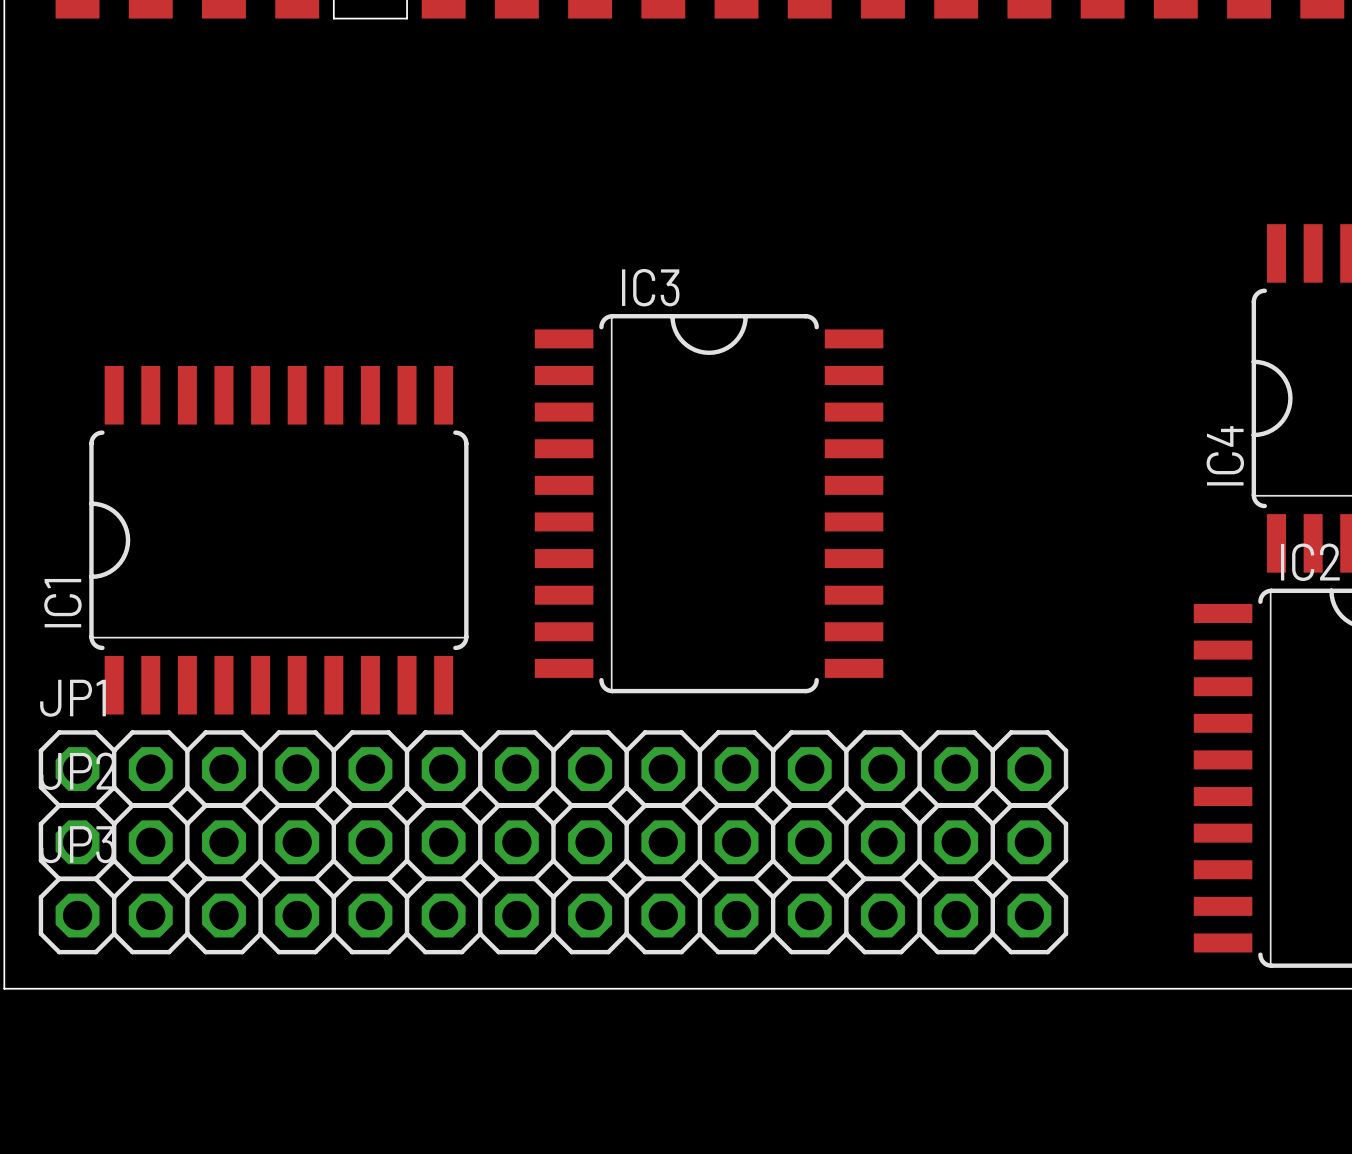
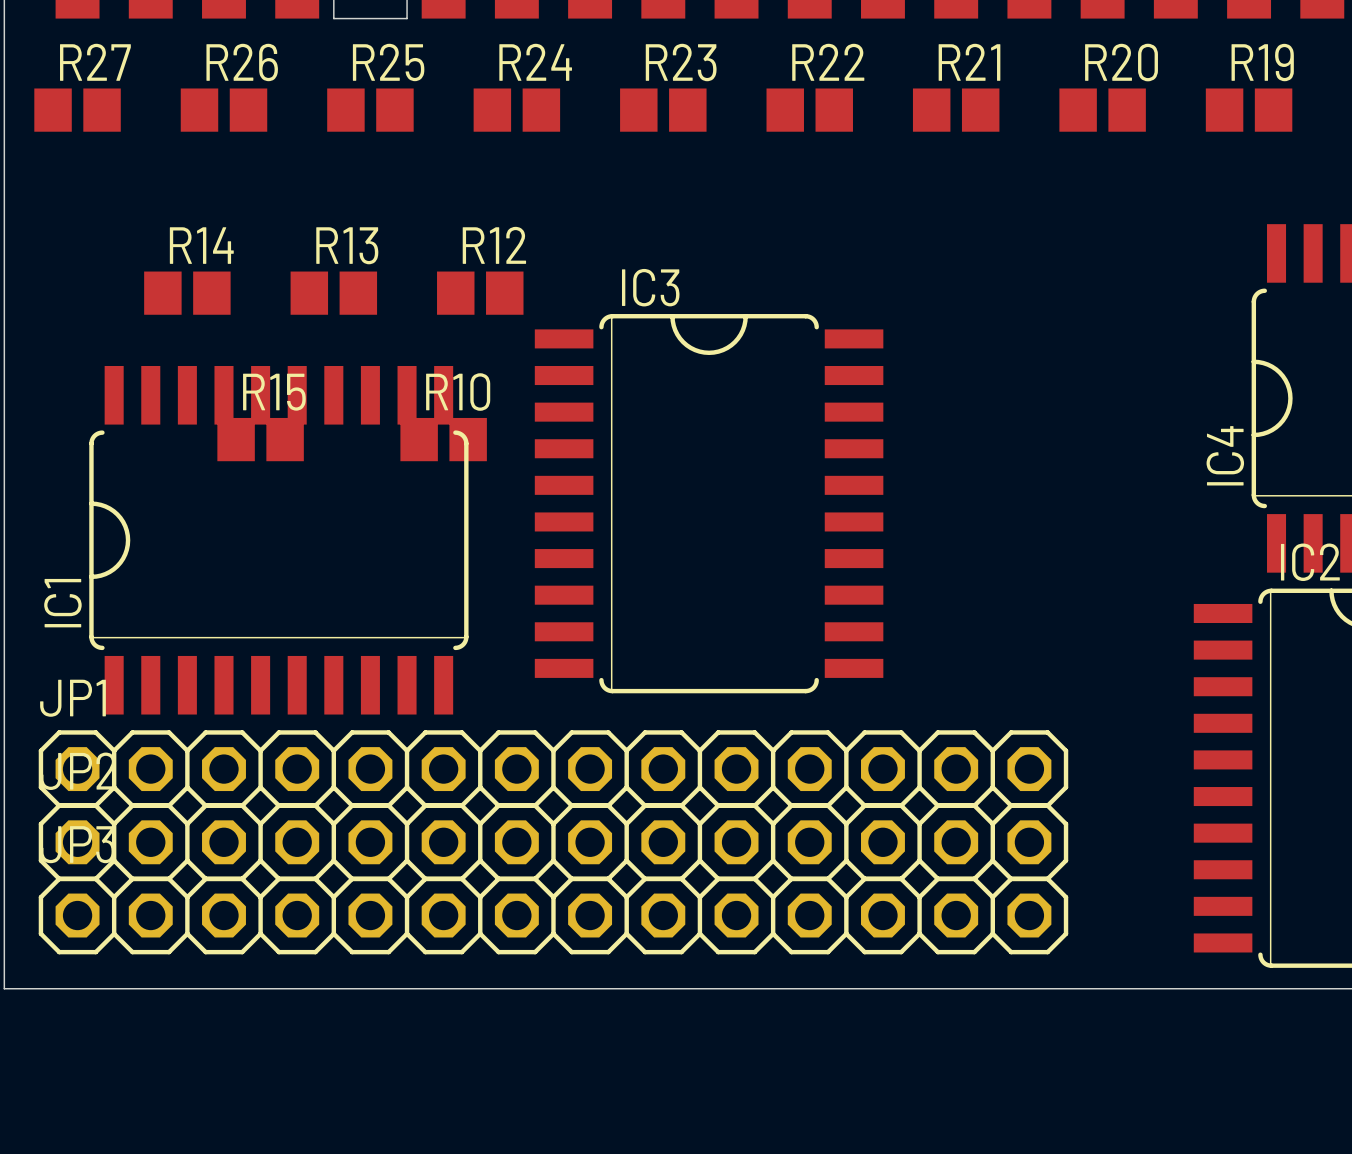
R27: none -> (77, 110)
R26: none -> (223, 110)
R25: none -> (370, 110)
R24: none -> (516, 110)
R23: none -> (663, 110)
R22: none -> (809, 110)
R21: none -> (956, 110)
R20: none -> (1102, 110)
R19: none -> (1249, 110)
R14: none -> (187, 293)
R13: none -> (333, 293)
R12: none -> (480, 293)
R15: none -> (260, 439)
R10: none -> (443, 439)

